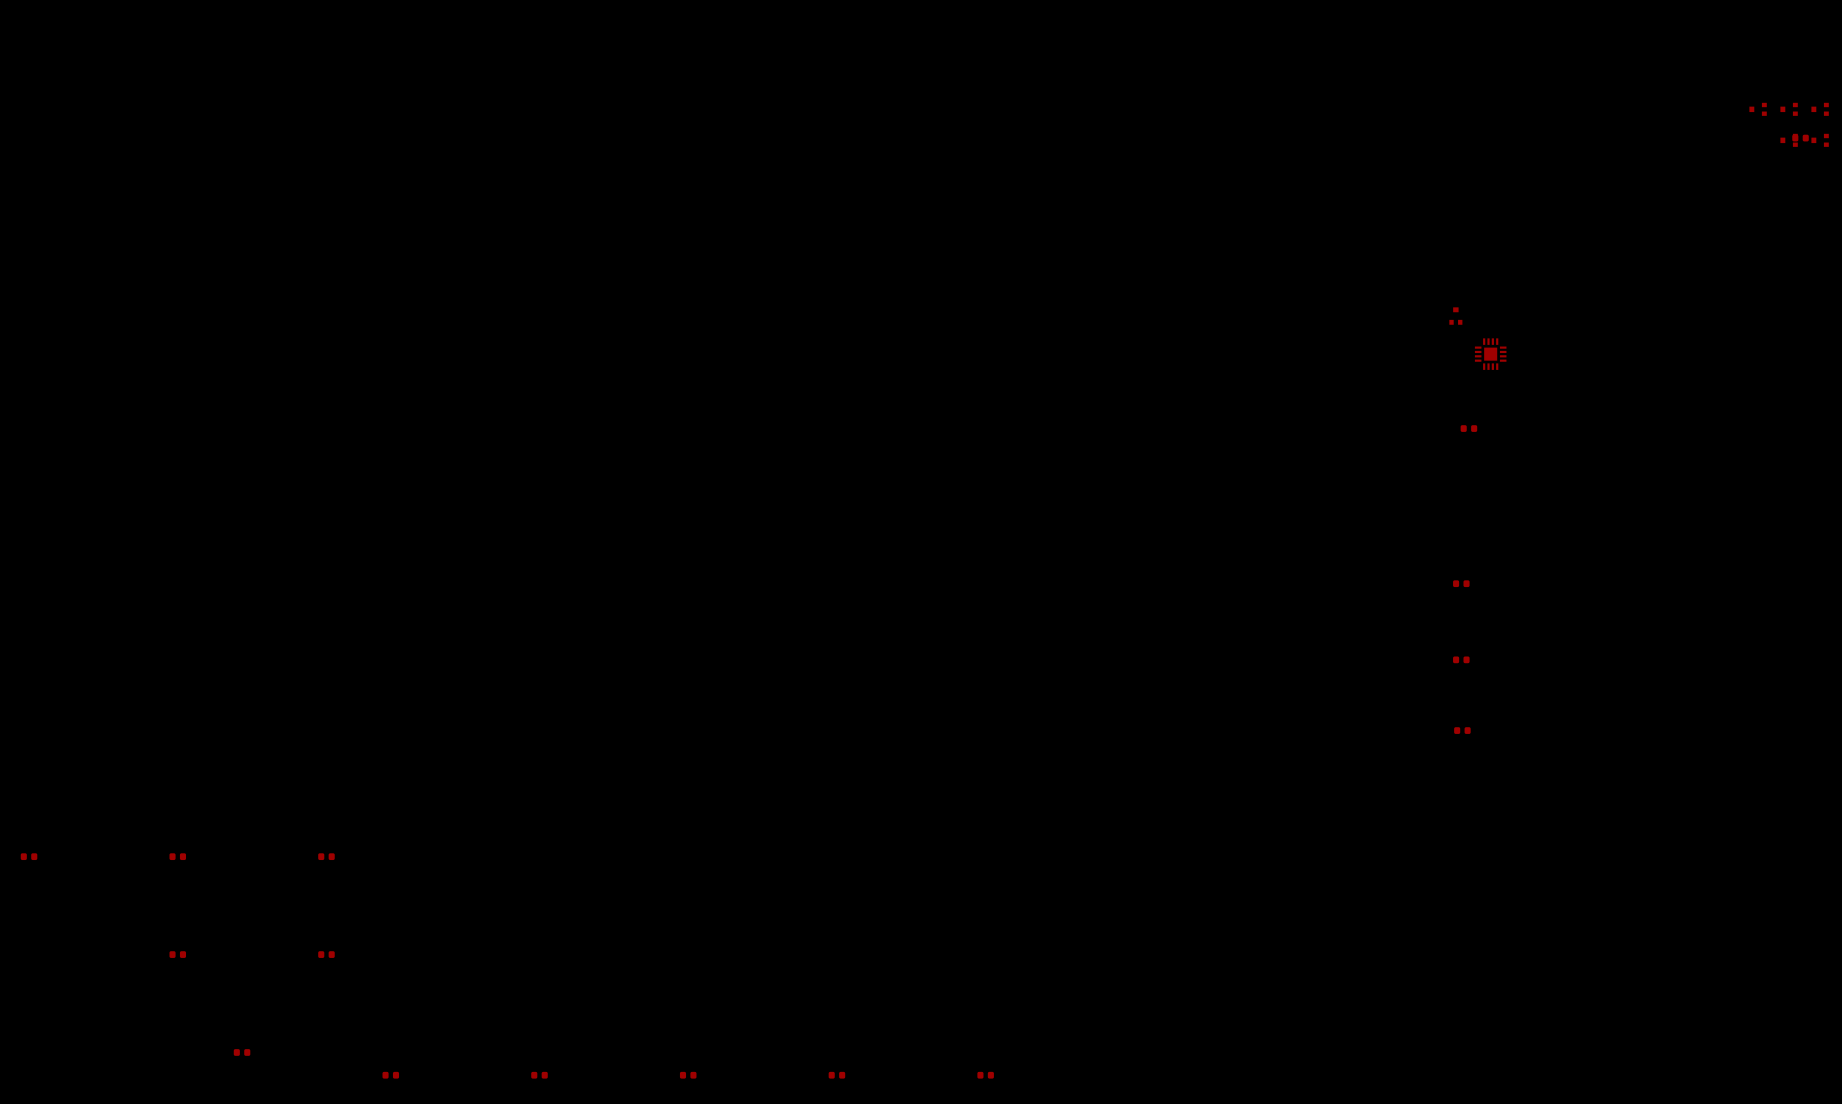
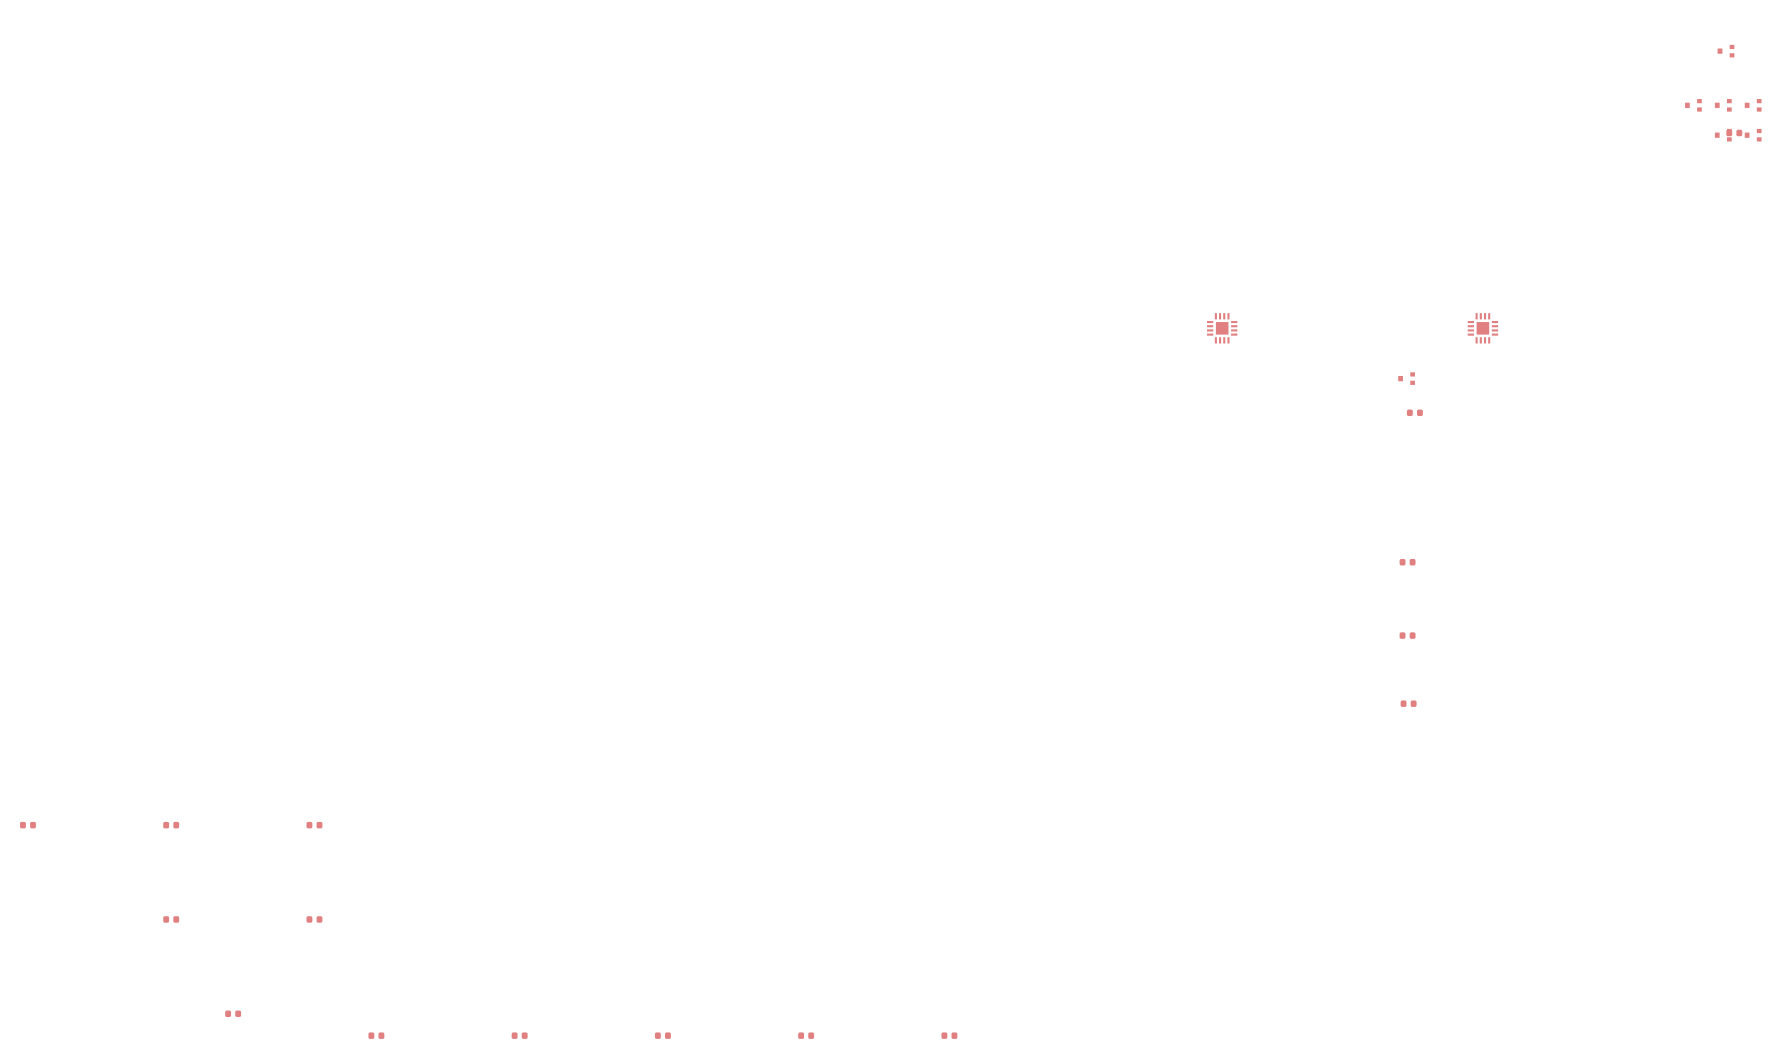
part: none -> (1726, 51)
part rotation: 0° (1455, 316) -> 90° counterclockwise (1406, 378)
part position: (1455, 316) -> (1406, 378)
part: none -> (1222, 328)
part position: (1490, 354) -> (1482, 328)

